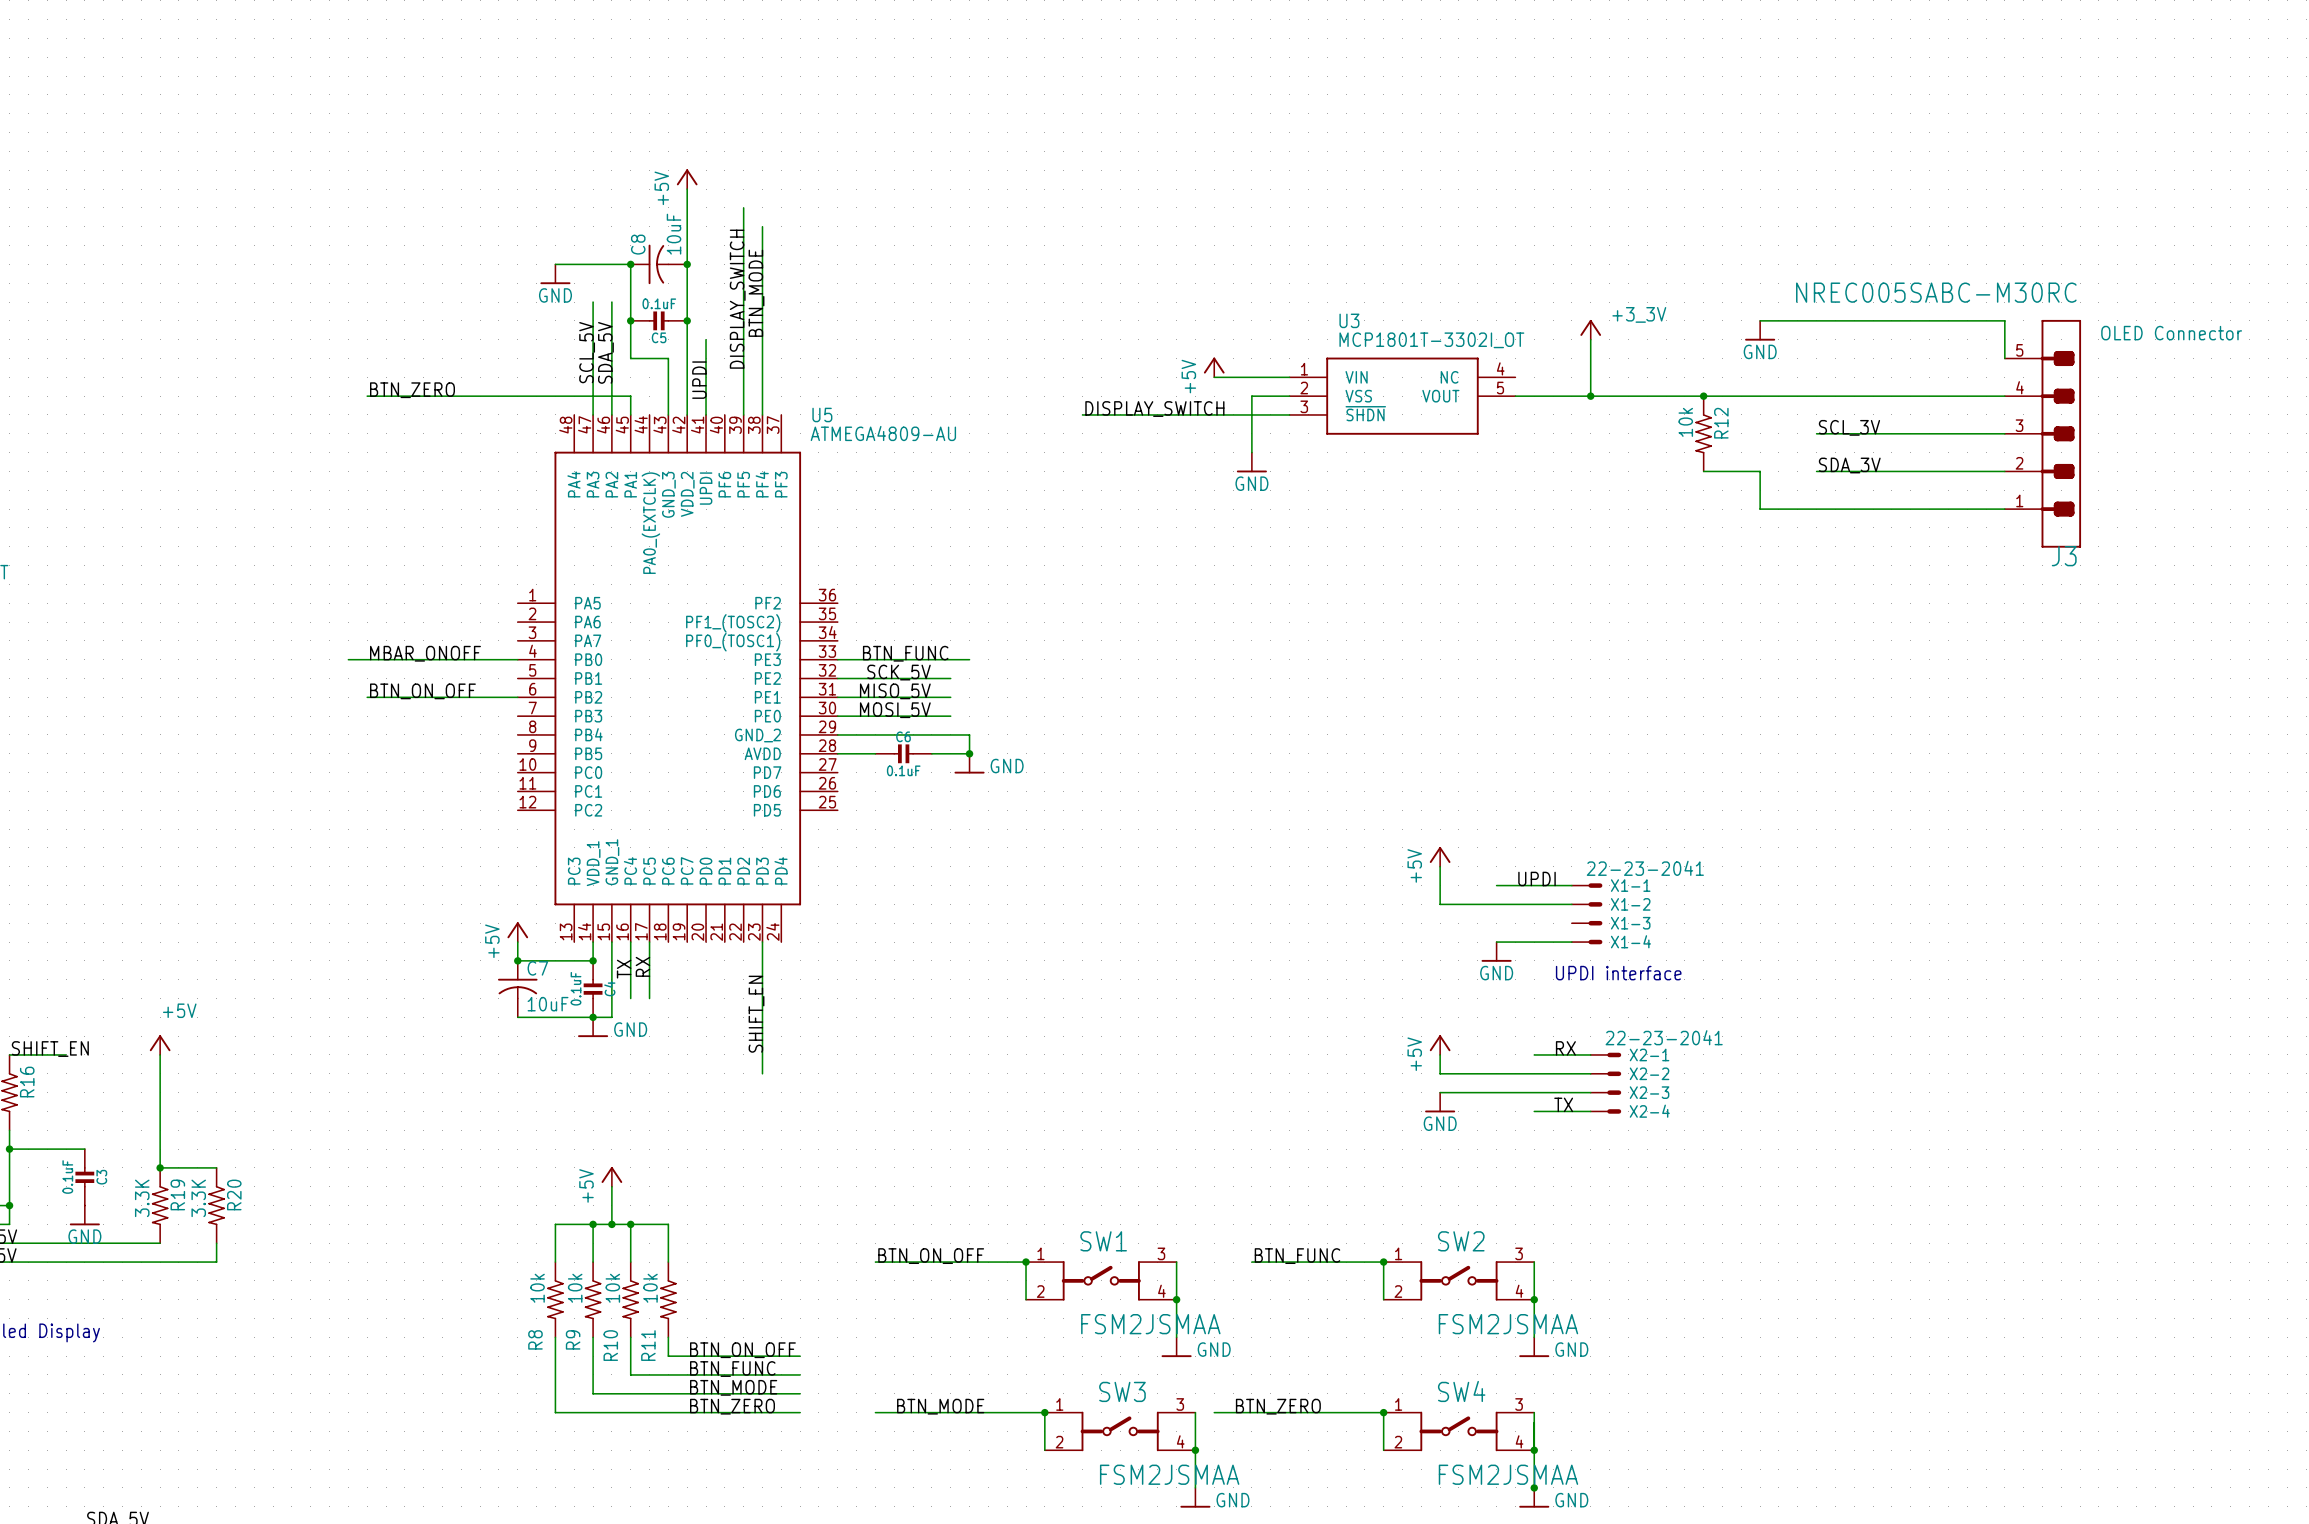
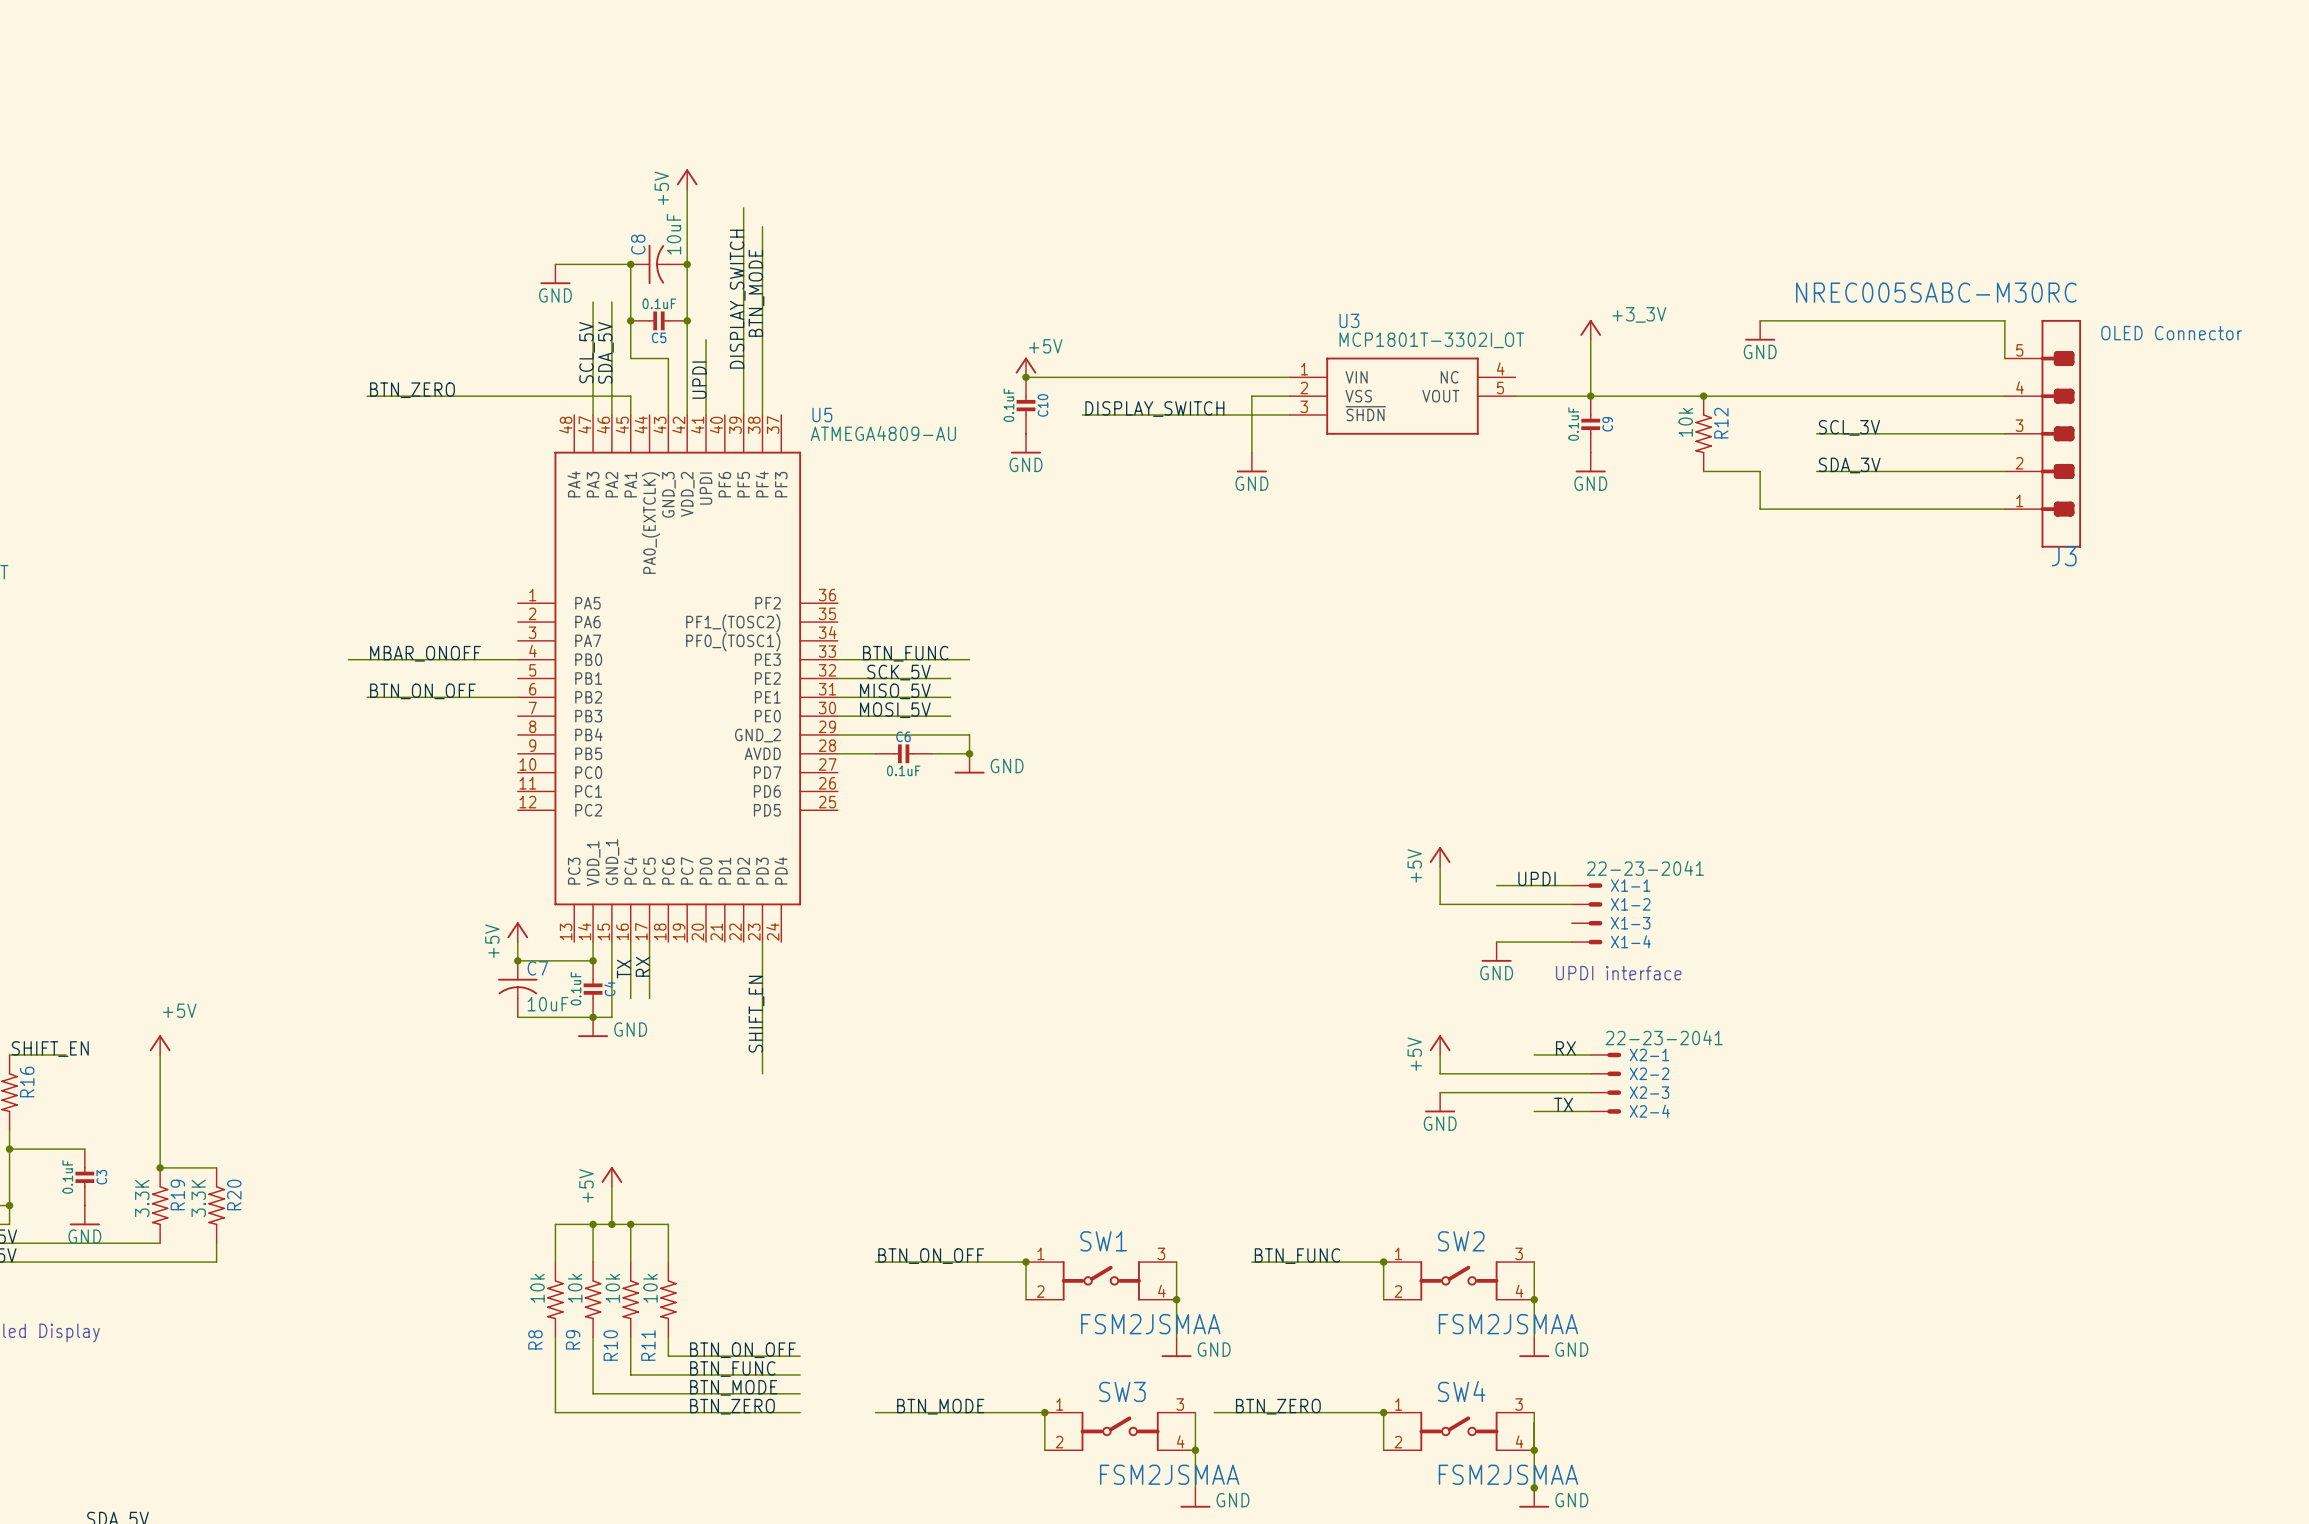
power symbol: none -> +5V (1026, 367)
power symbol: +5V (1214, 367) -> none
wire: none -> (1026, 377) (1214, 377)
junction: none -> (1026, 377)
C10: none -> 0.1uF (1026, 405)
C9: none -> 0.1uF (1590, 424)
power symbol: none -> GND (1026, 443)
power symbol: none -> GND (1590, 462)

